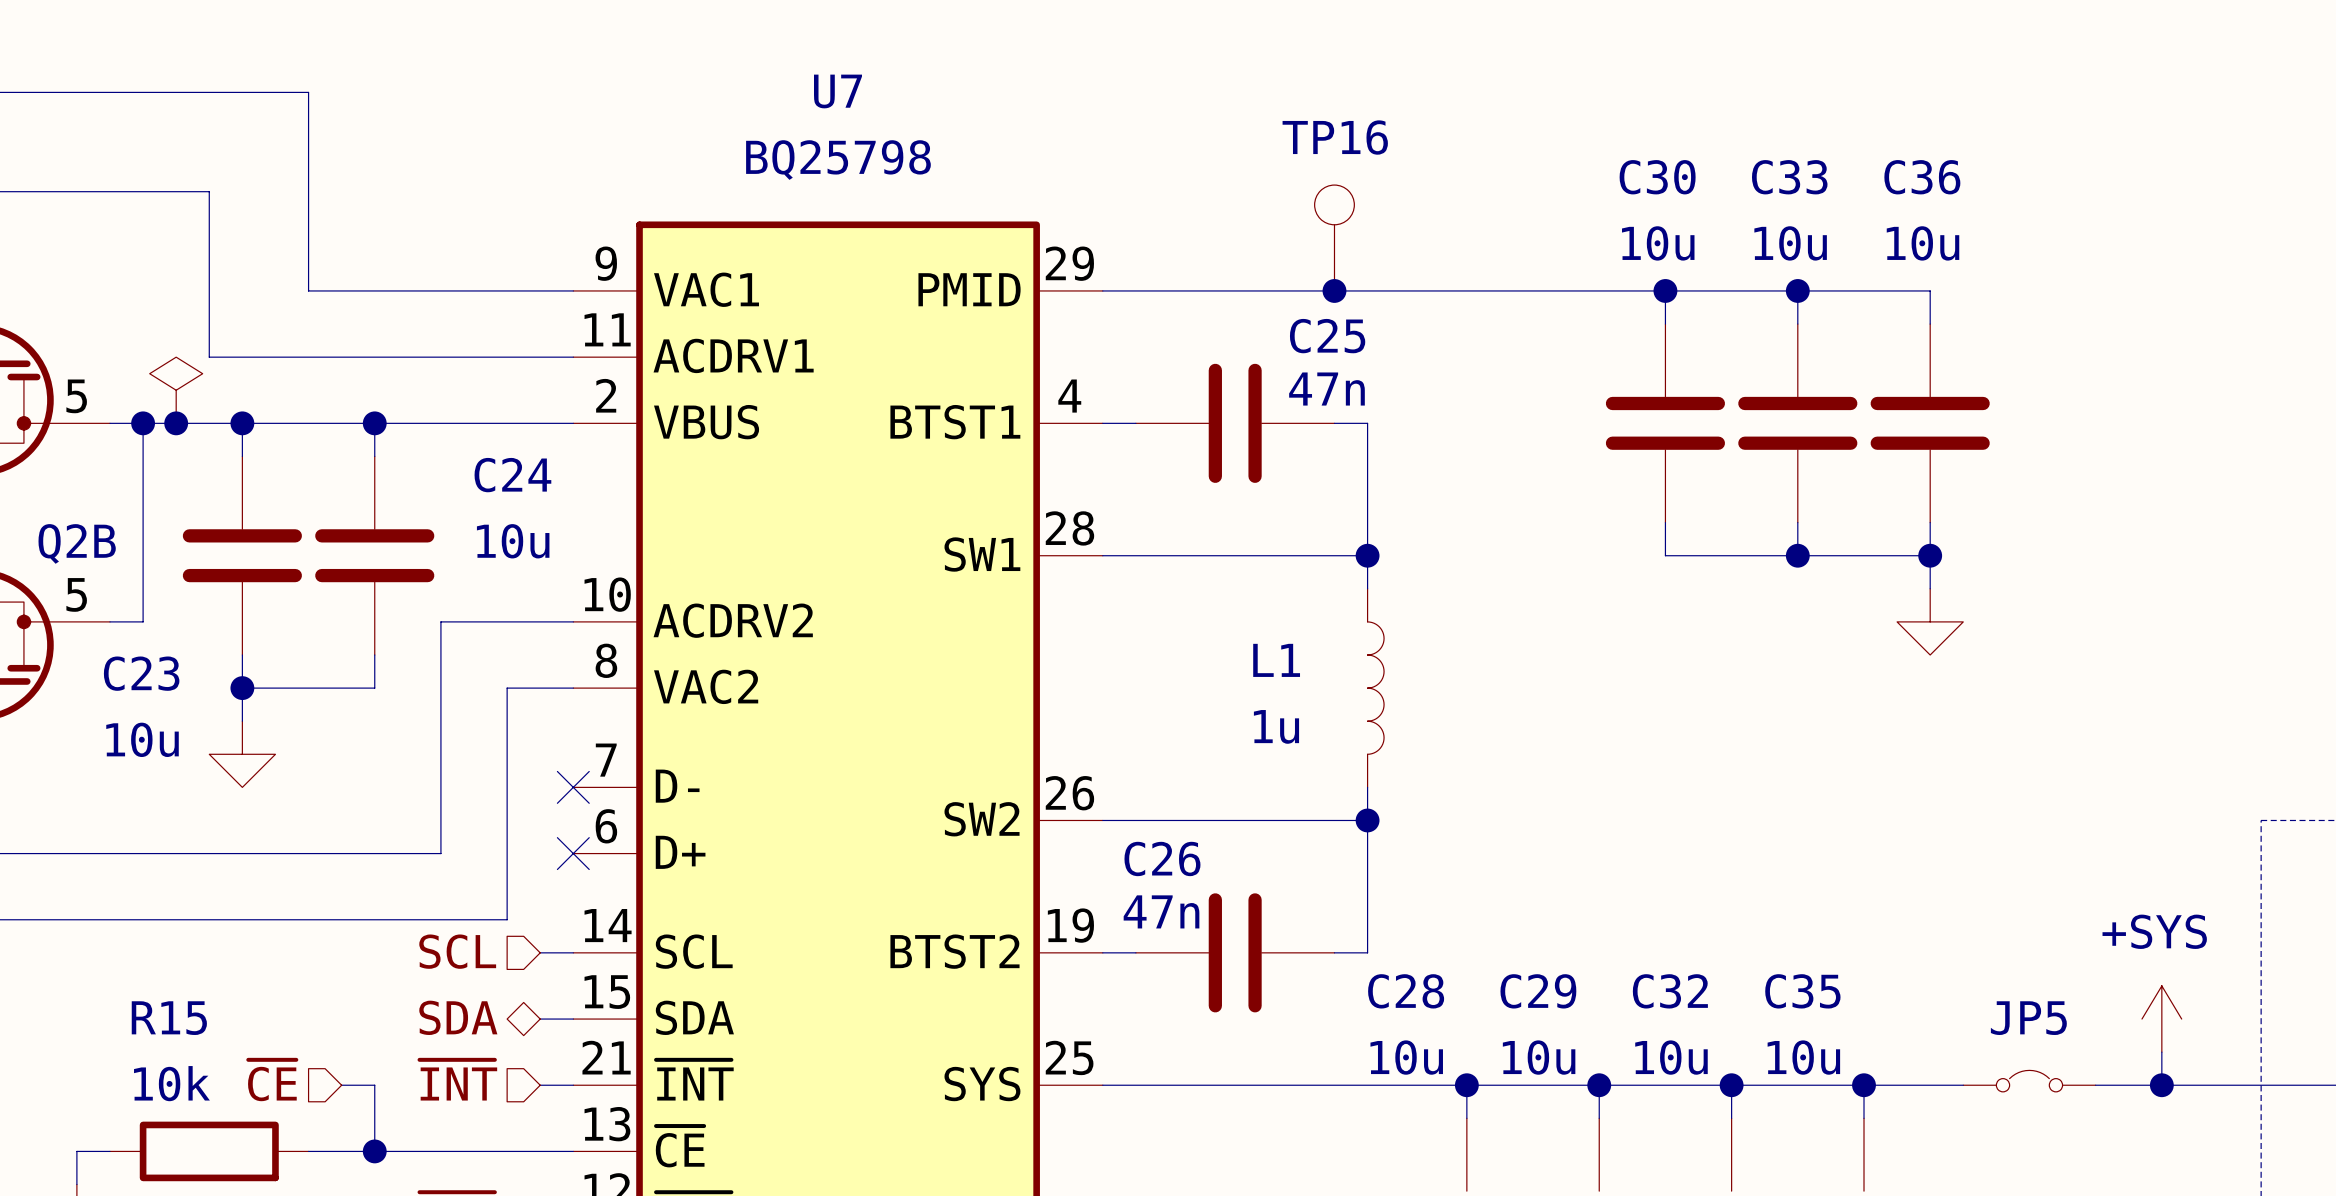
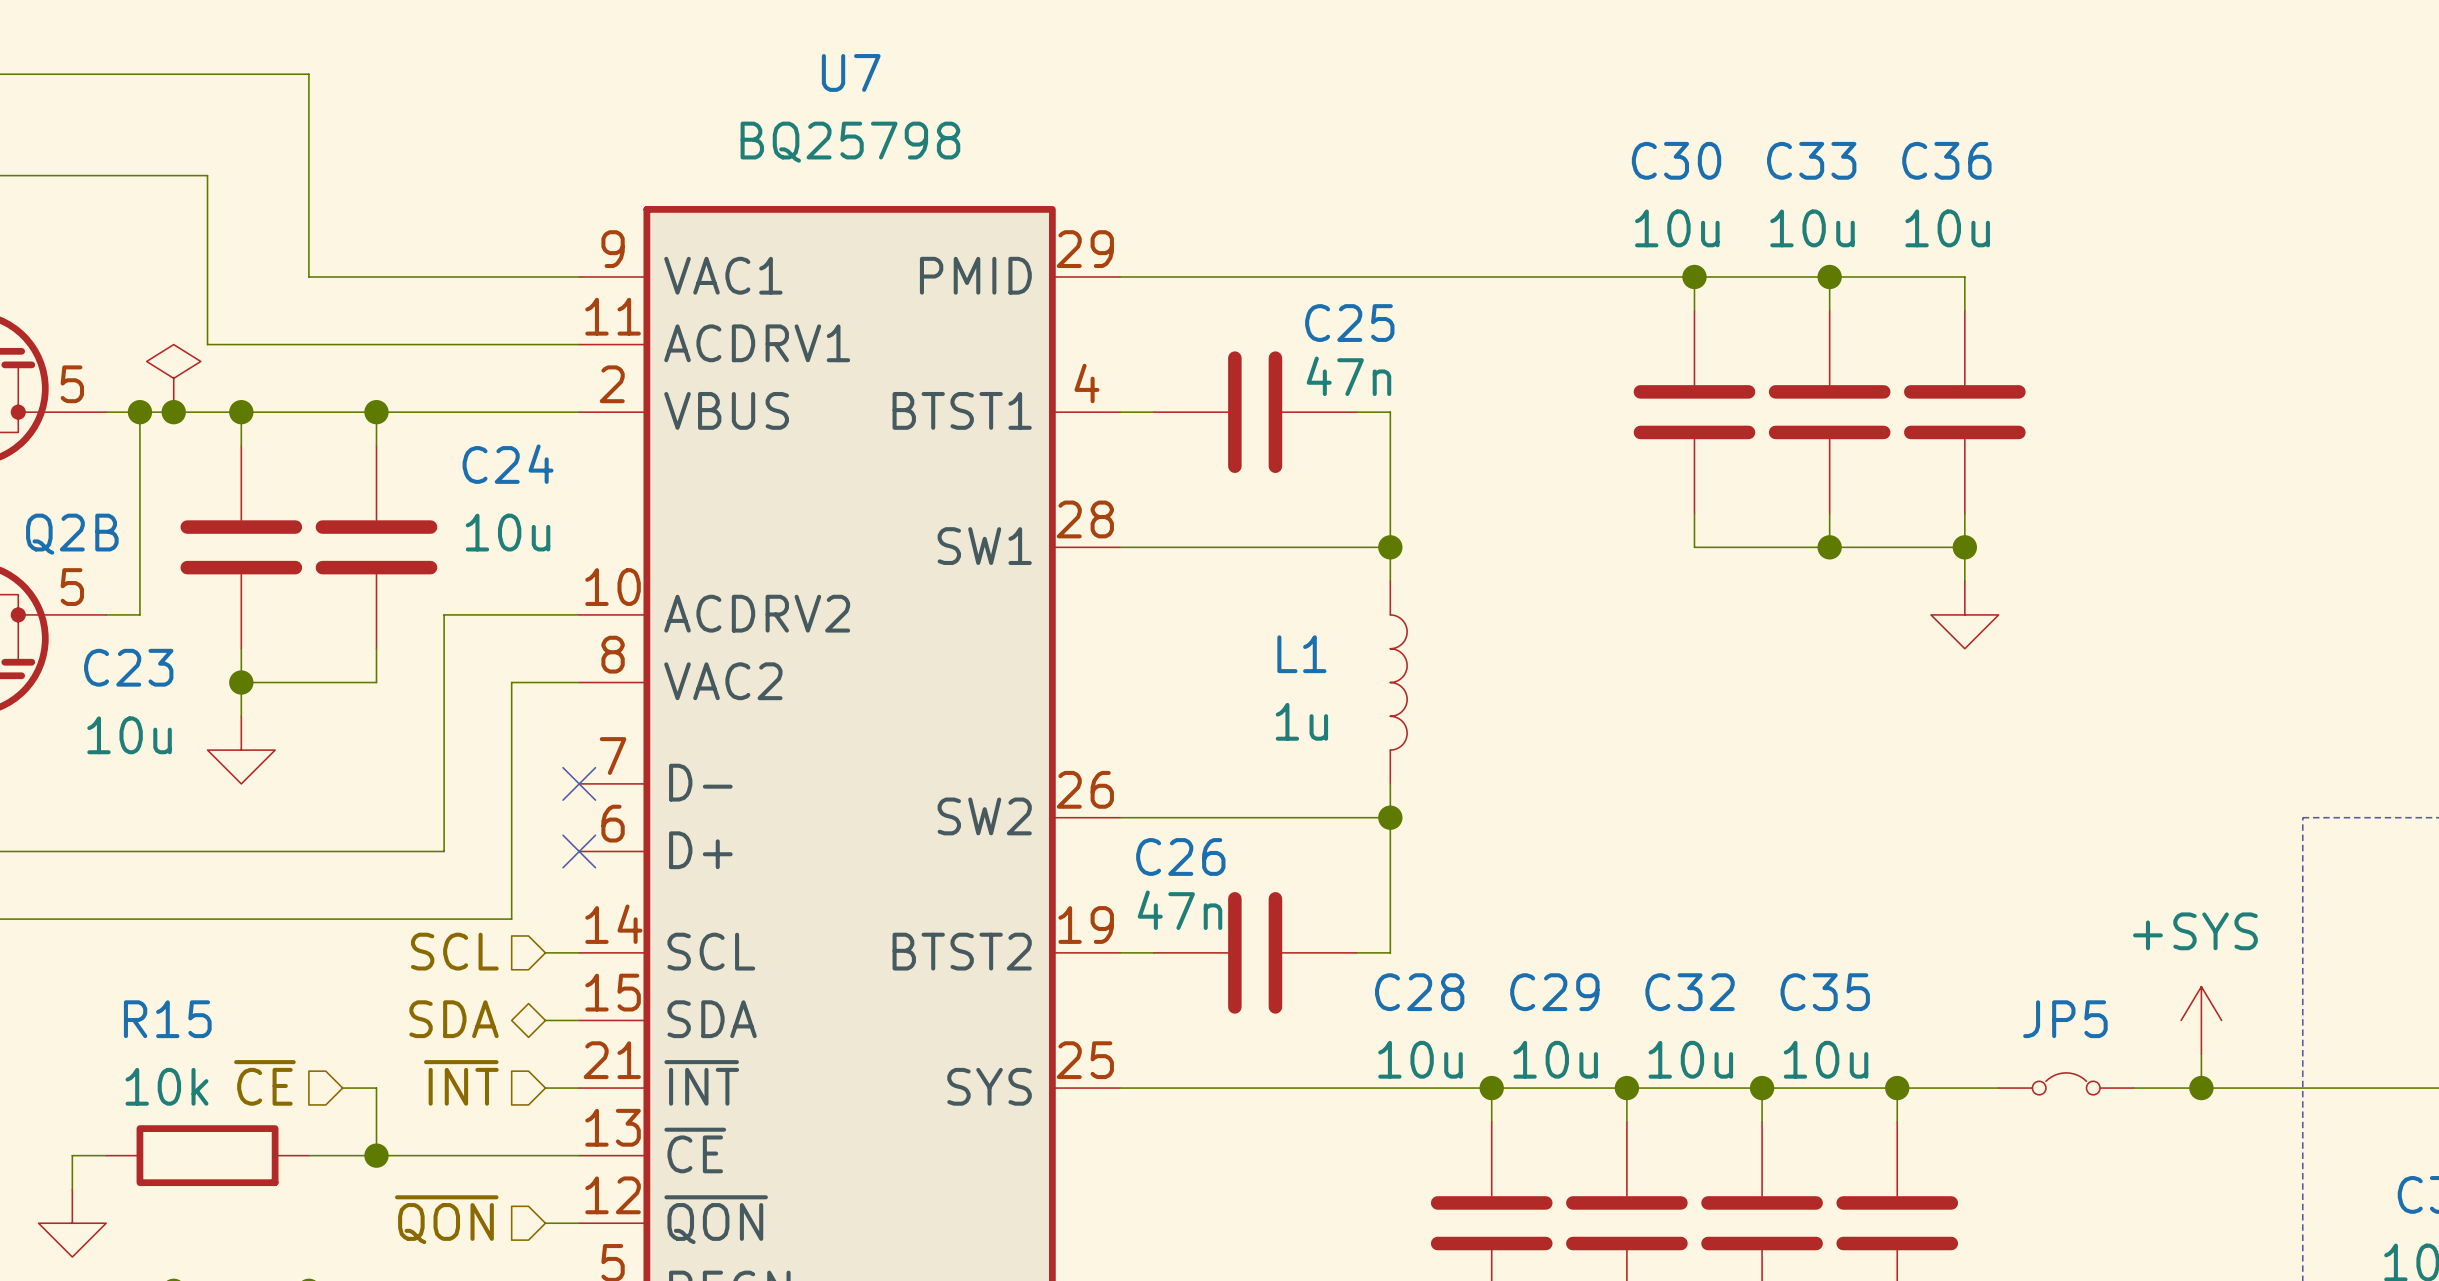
TP16: (1334, 238) -> none
junction: (1334, 290) -> none

